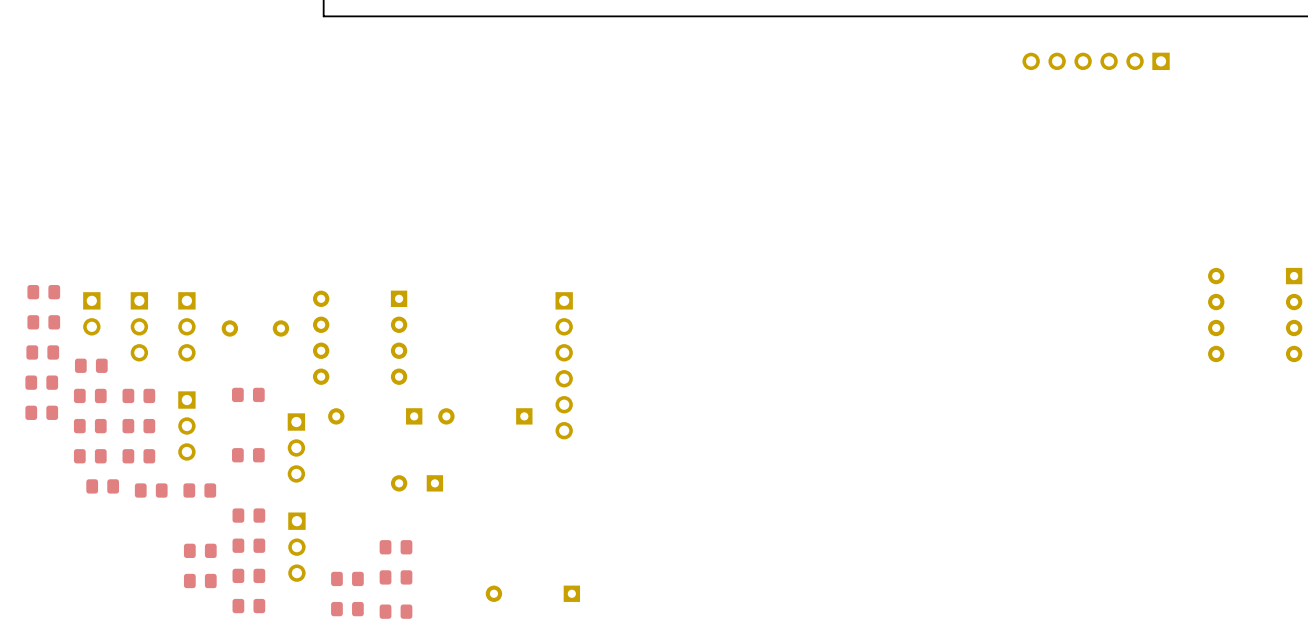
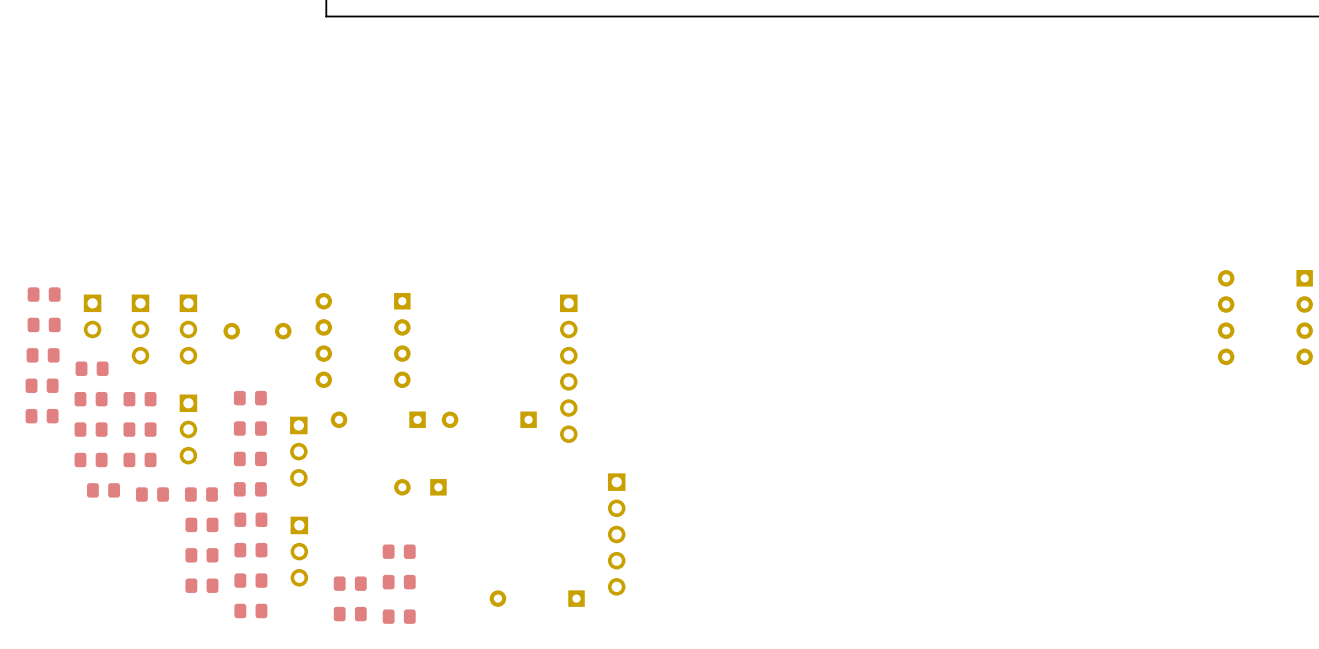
part: (1096, 61) -> none
part: none -> (250, 428)
part: none -> (250, 489)
part: none -> (201, 524)
part: none -> (616, 534)

